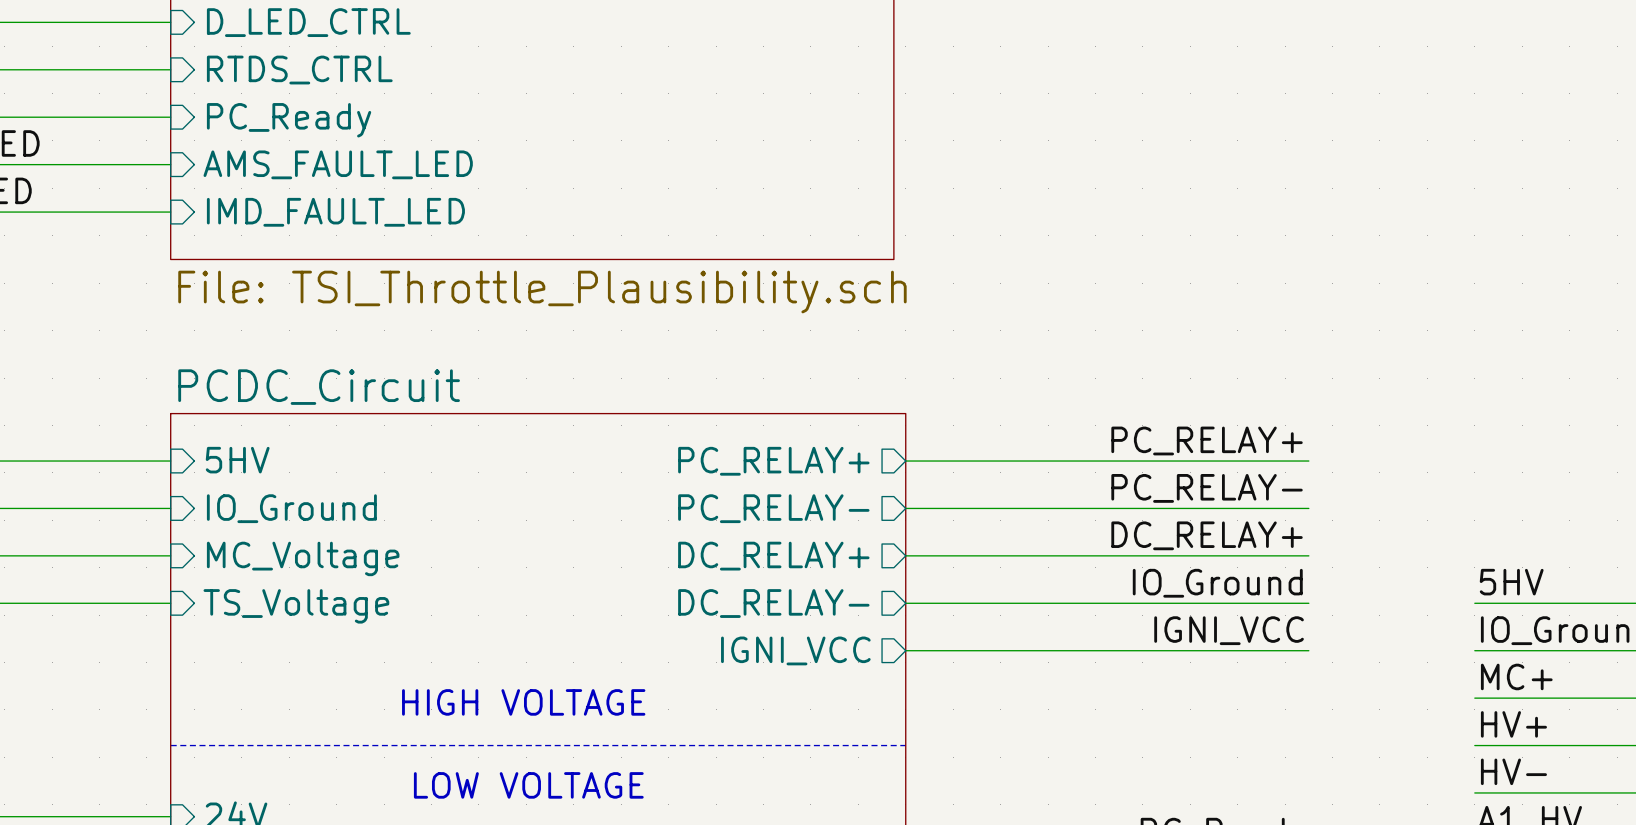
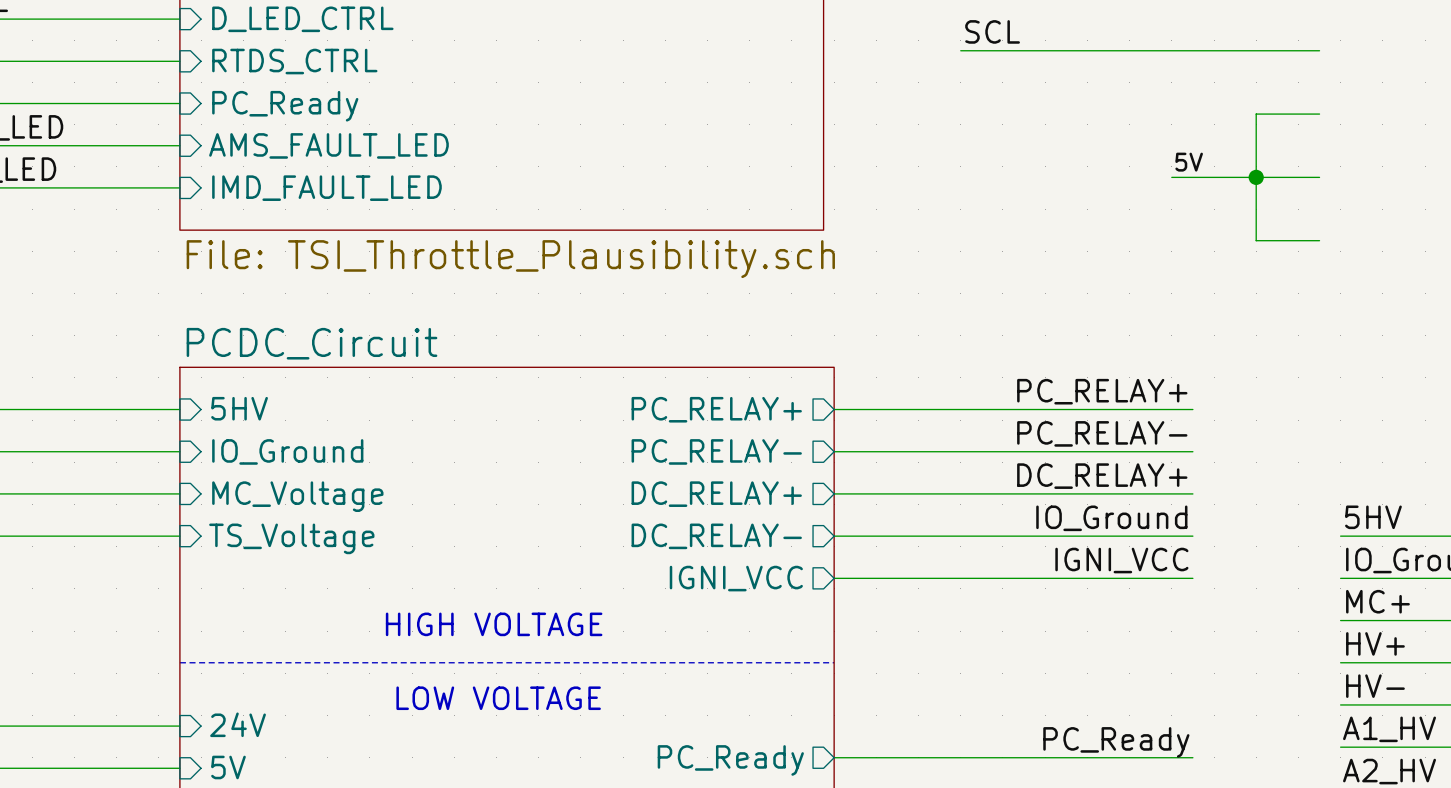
label: none -> SCL (992, 31)
wire: none -> (960, 50) (1319, 50)
wire: none -> (1319, 114) (1256, 114) (1256, 240) (1319, 240)
label: none -> 5V (1189, 162)
wire: none -> (1171, 177) (1319, 177)
junction: none -> (1256, 177)

